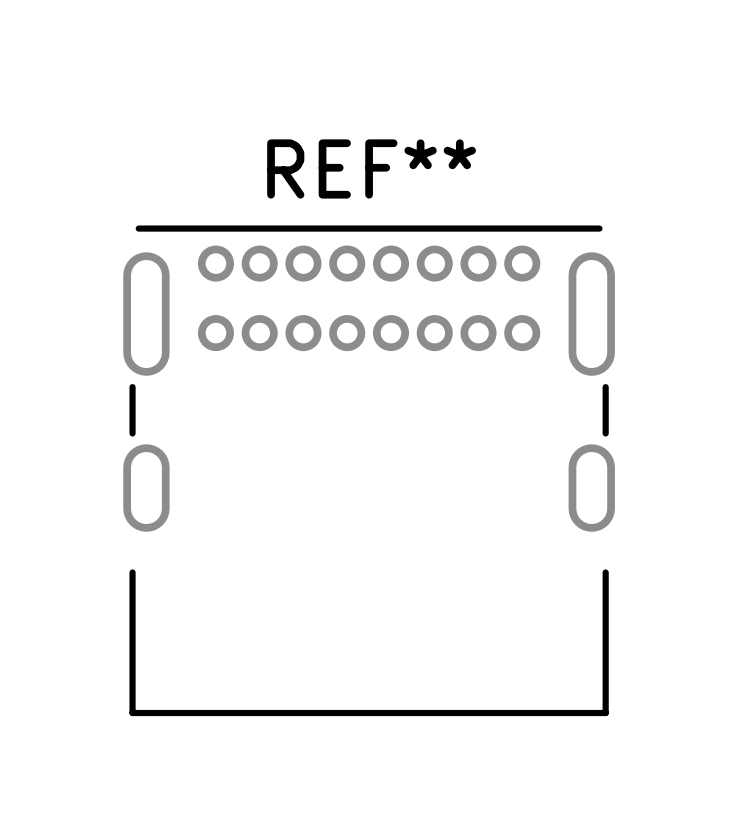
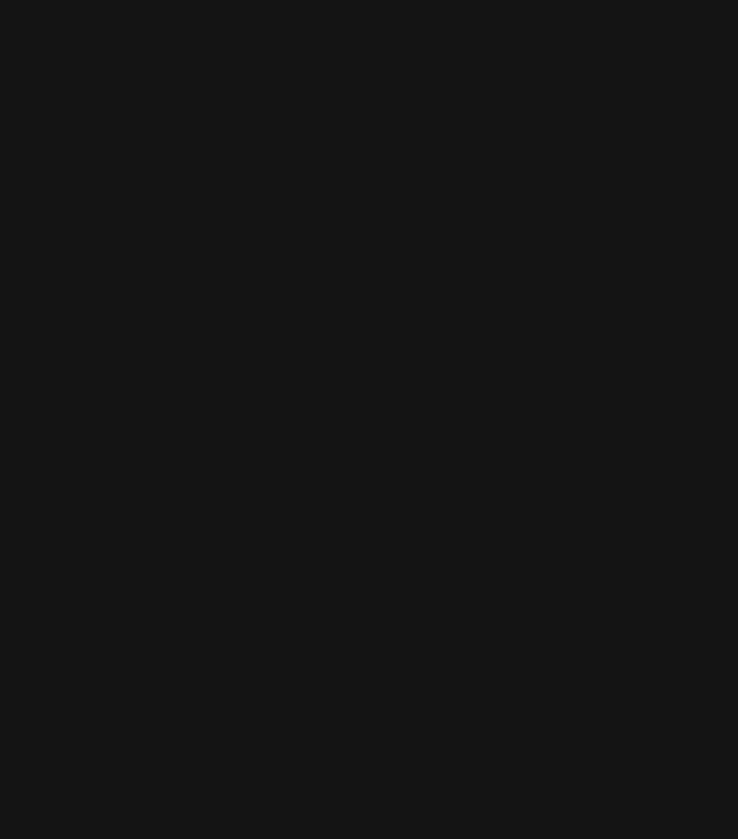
REF**: (369, 470) -> none

